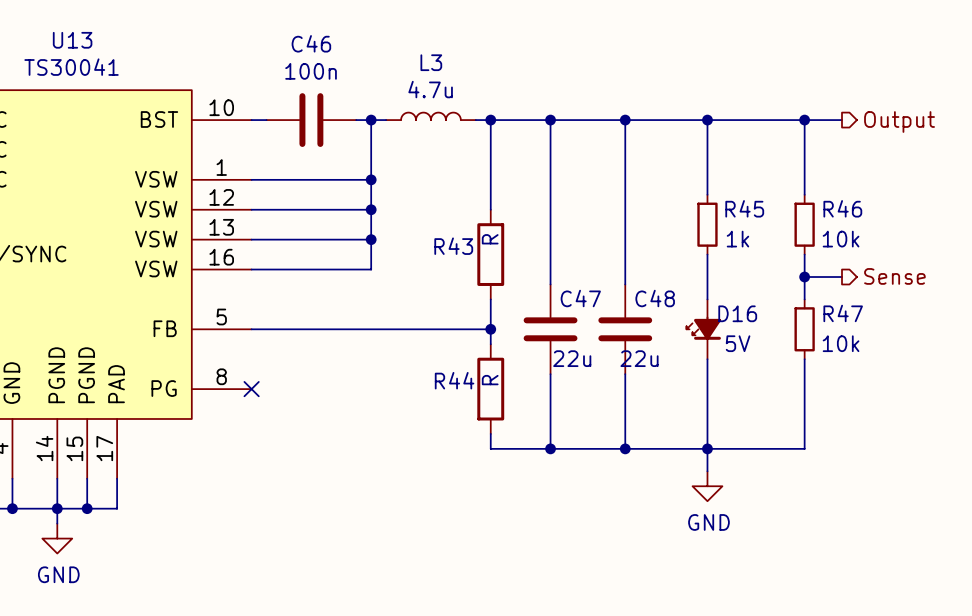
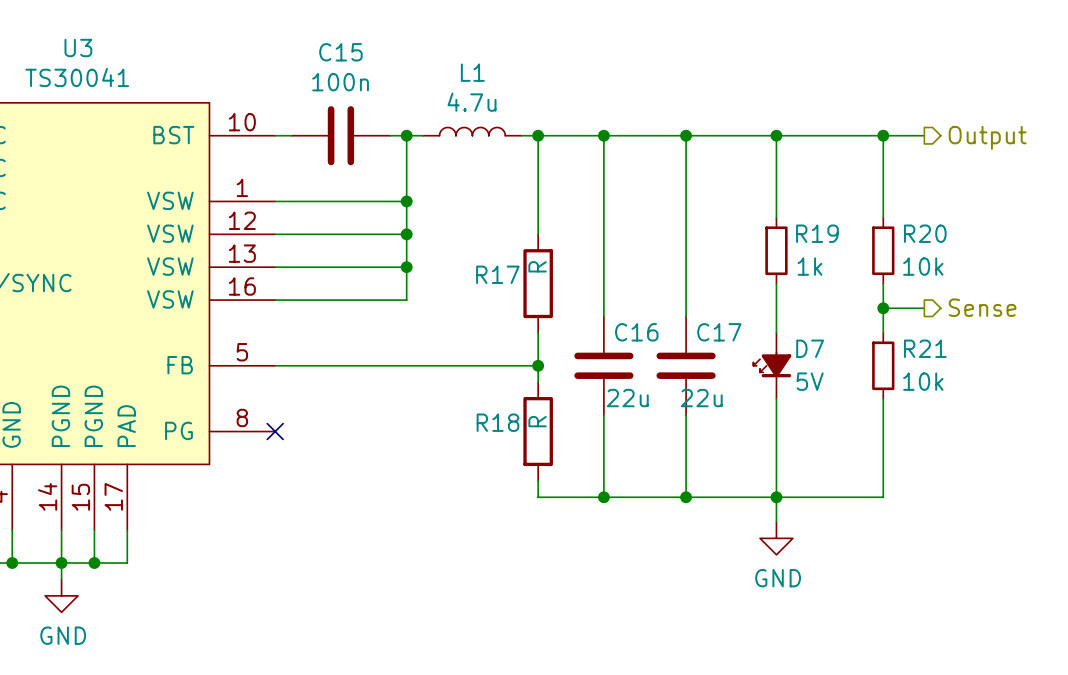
U13 name: U13 (72, 40) -> U3 (78, 48)
C46 name: C46 (311, 43) -> C15 (340, 52)
L3 name: L3 (431, 62) -> L1 (472, 72)
R45 name: R45 (744, 208) -> R19 (817, 233)
R46 name: R46 (842, 208) -> R20 (925, 233)
R43 name: R43 (453, 246) -> R17 (497, 274)
C47 name: C47 (580, 298) -> C16 (636, 332)
C48 name: C48 (655, 298) -> C17 (719, 332)
D16 name: D16 (737, 313) -> D7 (810, 348)
R47 name: R47 (843, 313) -> R21 (925, 348)
R44 name: R44 (454, 380) -> R18 (497, 422)

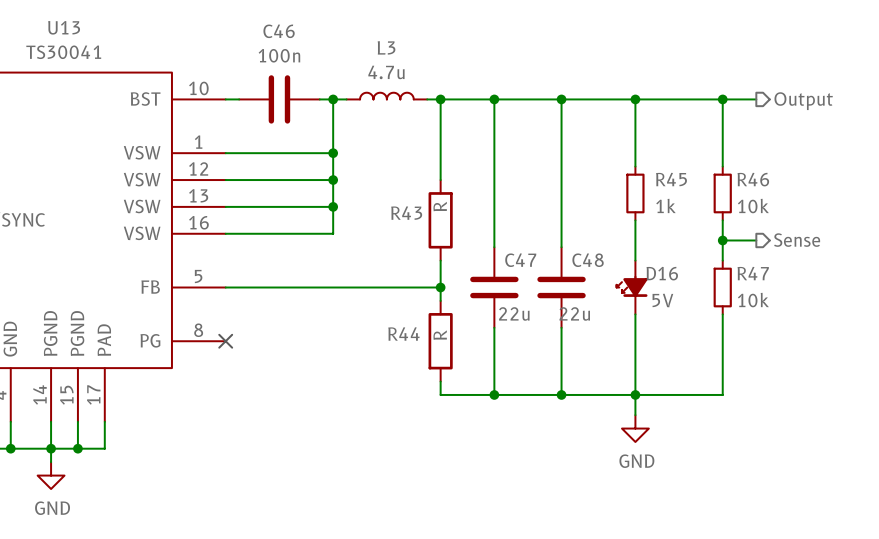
U3 name: U3 (78, 48) -> U13 (64, 27)
C15 name: C15 (340, 52) -> C46 (279, 31)
L1 name: L1 (472, 72) -> L3 (386, 47)
R19 name: R19 (817, 233) -> R45 (671, 179)
R20 name: R20 (925, 233) -> R46 (753, 179)
R17 name: R17 (497, 274) -> R43 (406, 213)
C16 name: C16 (636, 332) -> C47 (520, 260)
C17 name: C17 (719, 332) -> C48 (588, 260)
D7 name: D7 (810, 348) -> D16 (662, 273)
R21 name: R21 (925, 348) -> R47 (753, 273)
R18 name: R18 (497, 422) -> R44 (403, 334)

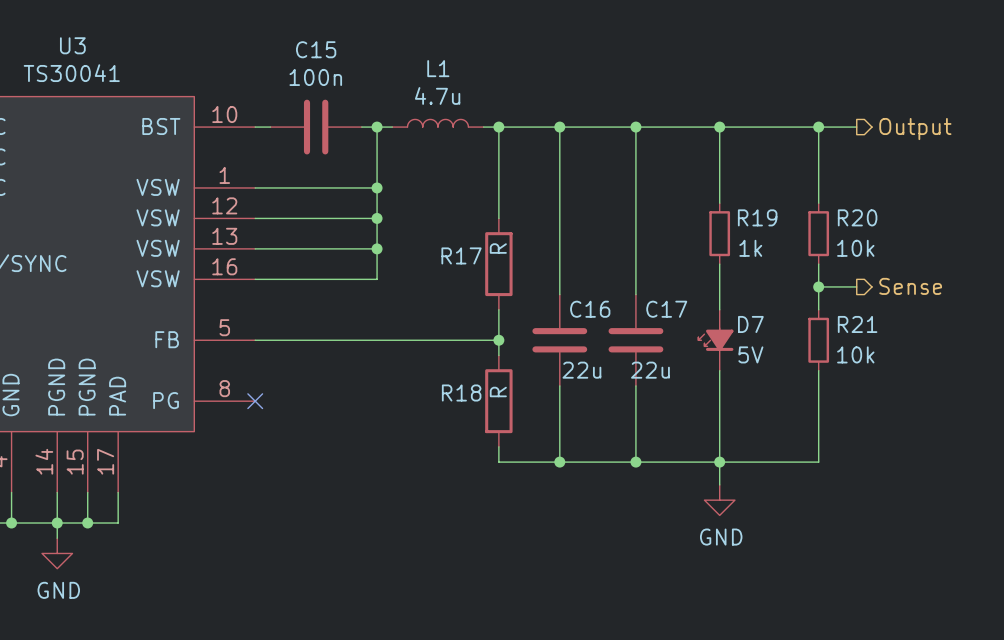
U13 name: U13 (64, 27) -> U3 (72, 45)
C46 name: C46 (279, 31) -> C15 (316, 49)
L3 name: L3 (386, 47) -> L1 (438, 68)
R45 name: R45 (671, 179) -> R19 (757, 217)
R46 name: R46 (753, 179) -> R20 (857, 217)
R43 name: R43 (406, 213) -> R17 (461, 255)
C47 name: C47 (520, 260) -> C16 (590, 309)
C48 name: C48 (588, 260) -> C17 (666, 309)
D16 name: D16 (662, 273) -> D7 (750, 324)
R47 name: R47 (753, 273) -> R21 (857, 324)
R44 name: R44 (403, 334) -> R18 (461, 392)

